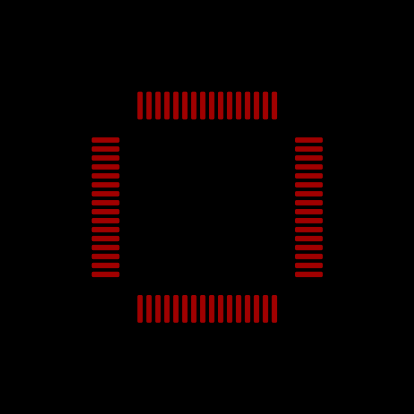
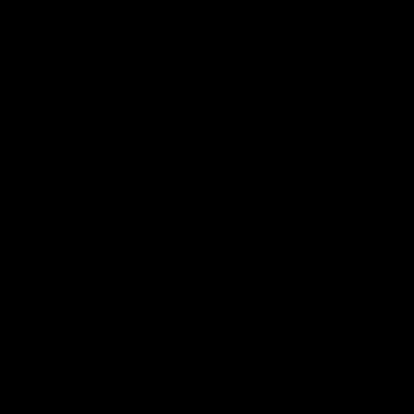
part: (207, 207) -> none

